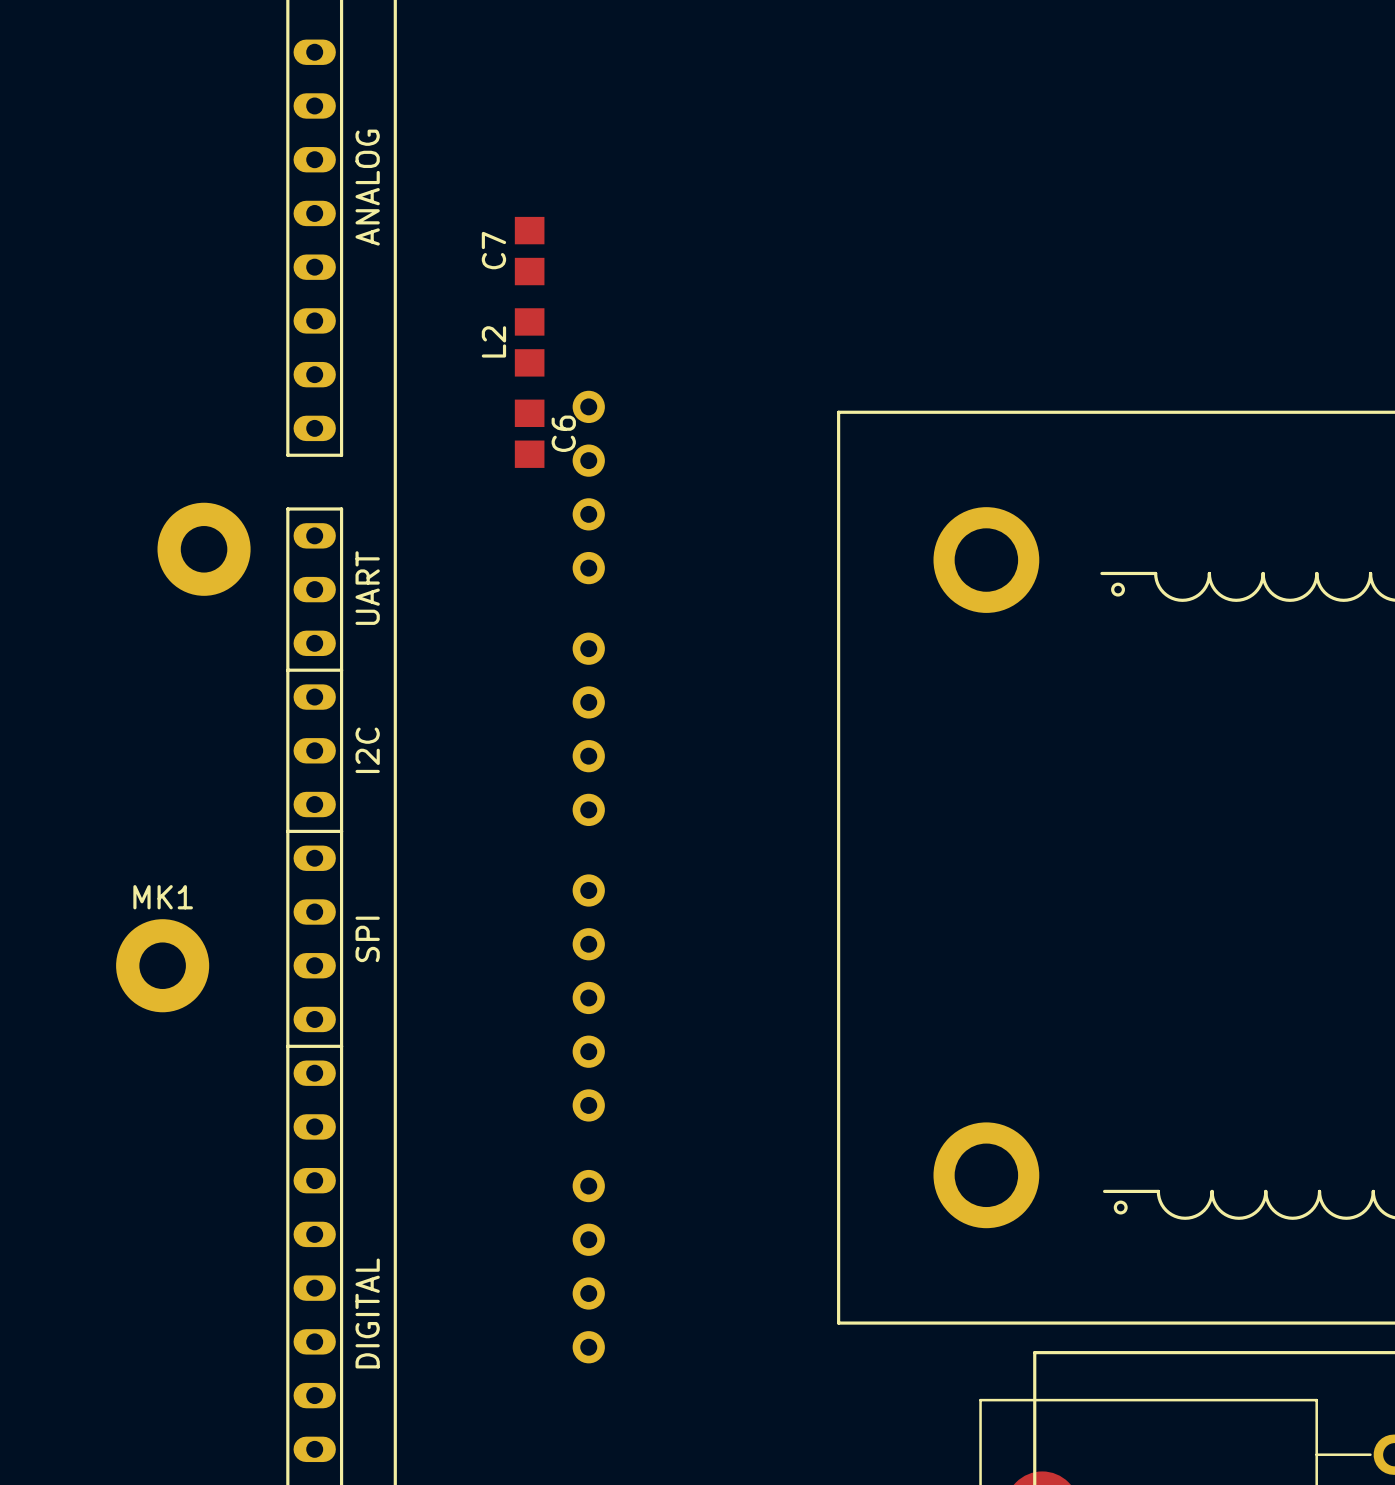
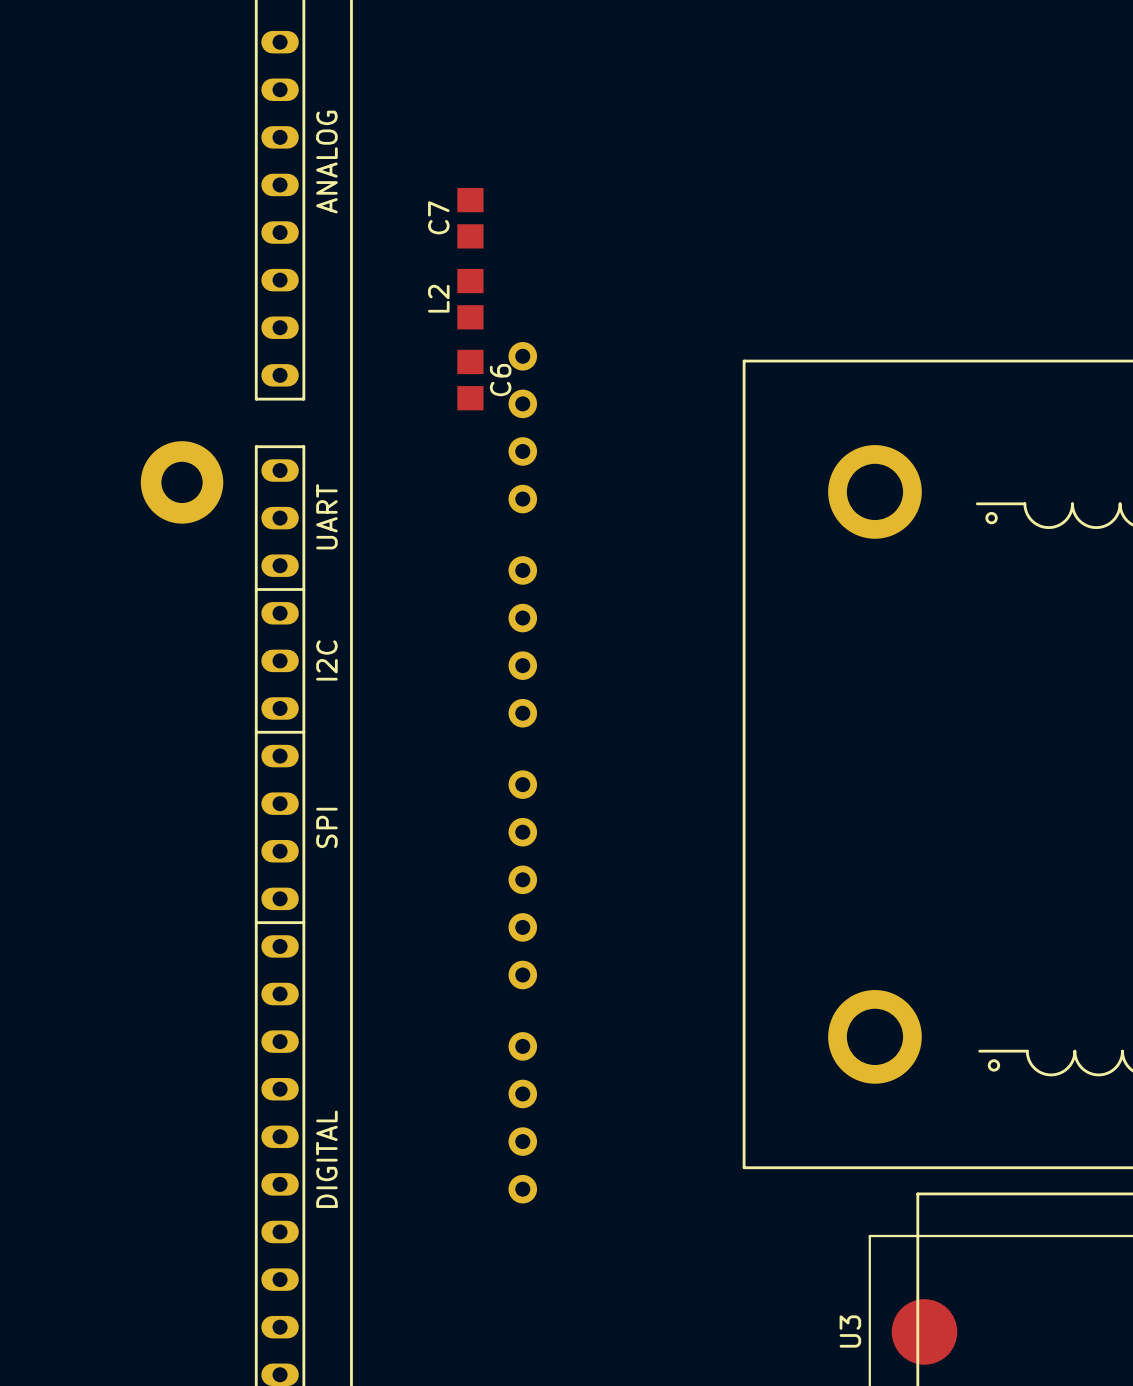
MK1: (162, 965) -> none

